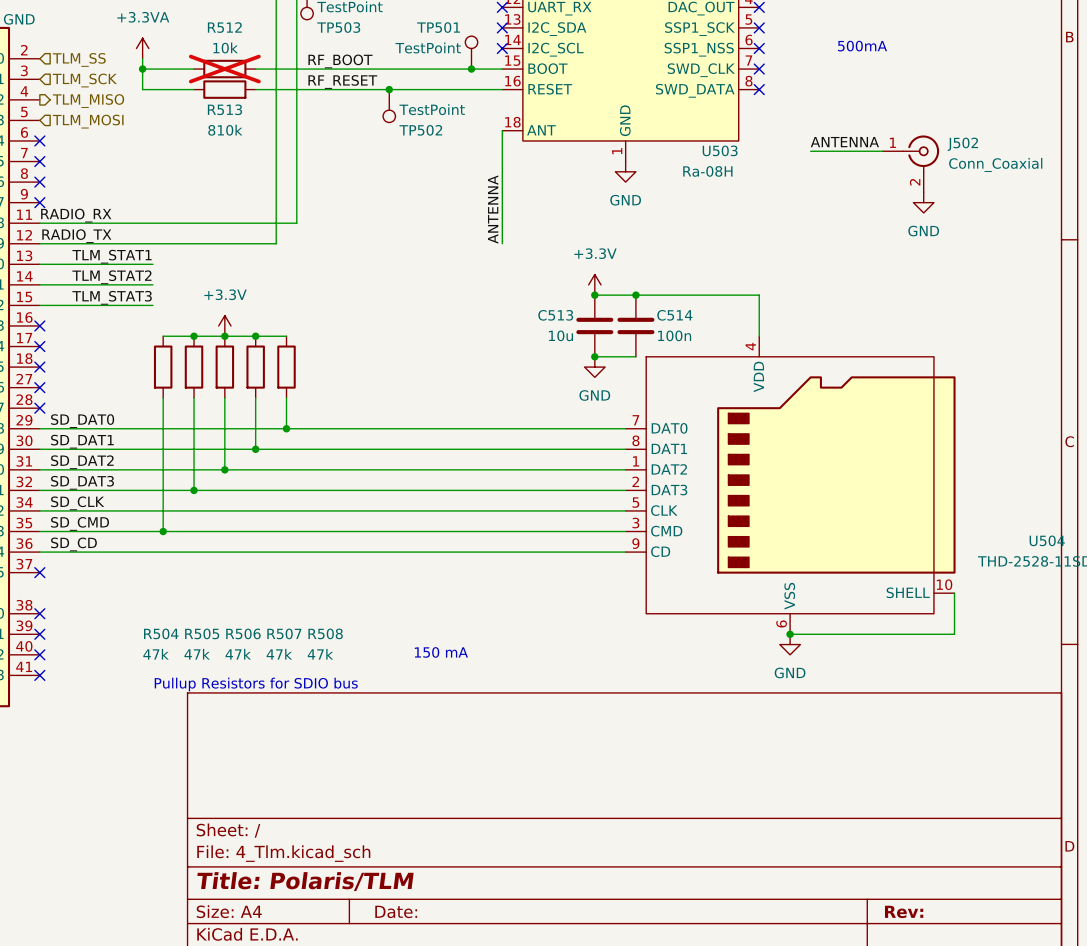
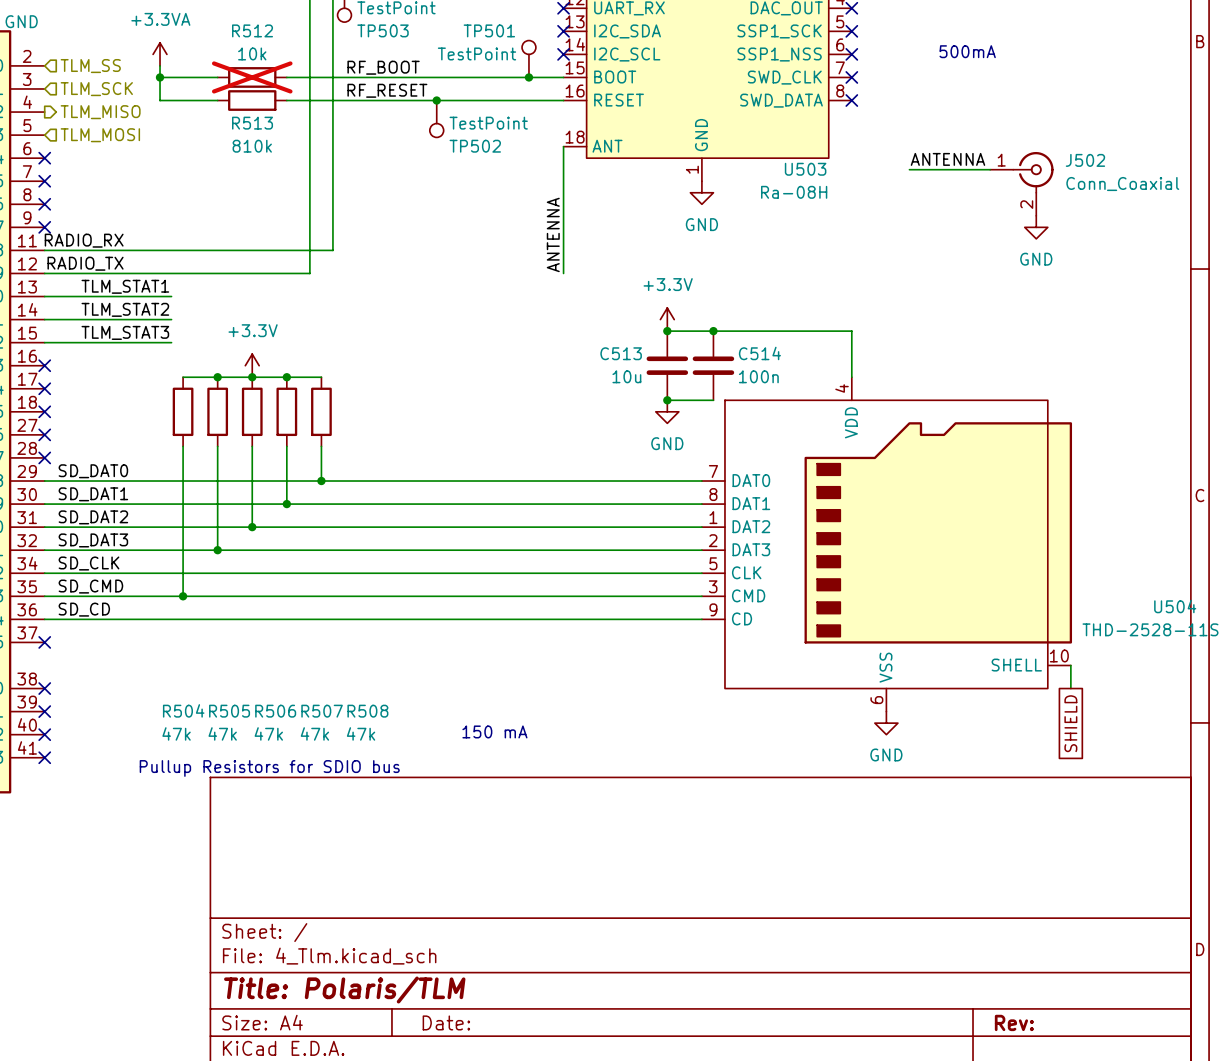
wire: (954, 613) (954, 634) (790, 634) -> none
junction: (790, 634) -> none
global label: none -> SHIELD (1070, 723)

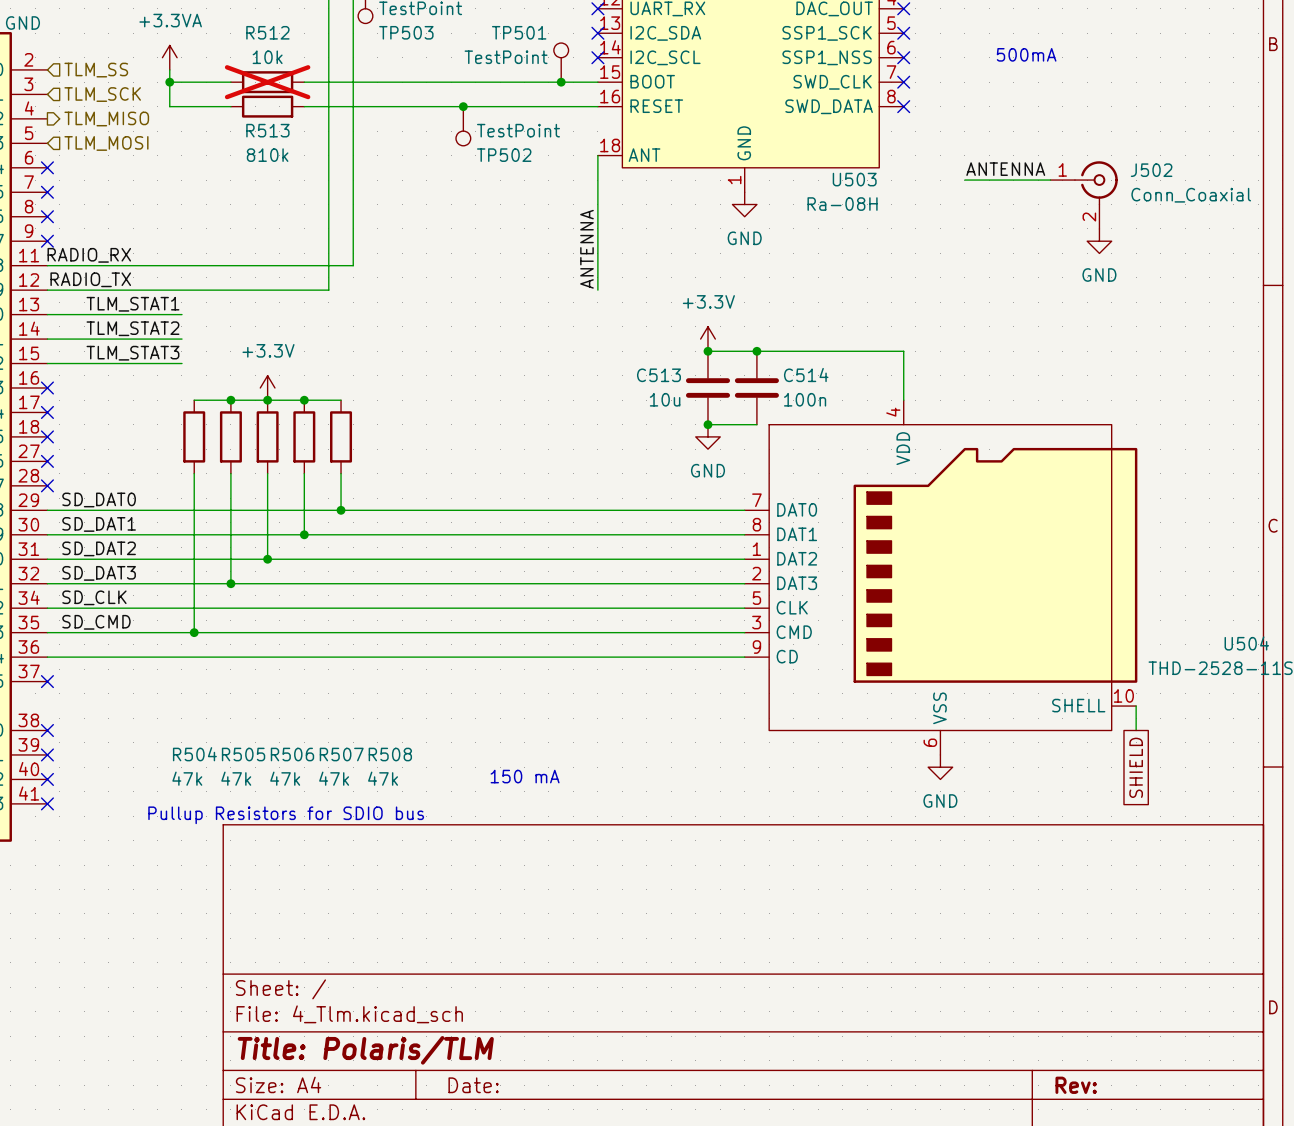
label: RF_BOOT (383, 67) -> none
label: RF_RESET (387, 90) -> none
label: SD_CD (84, 609) -> none

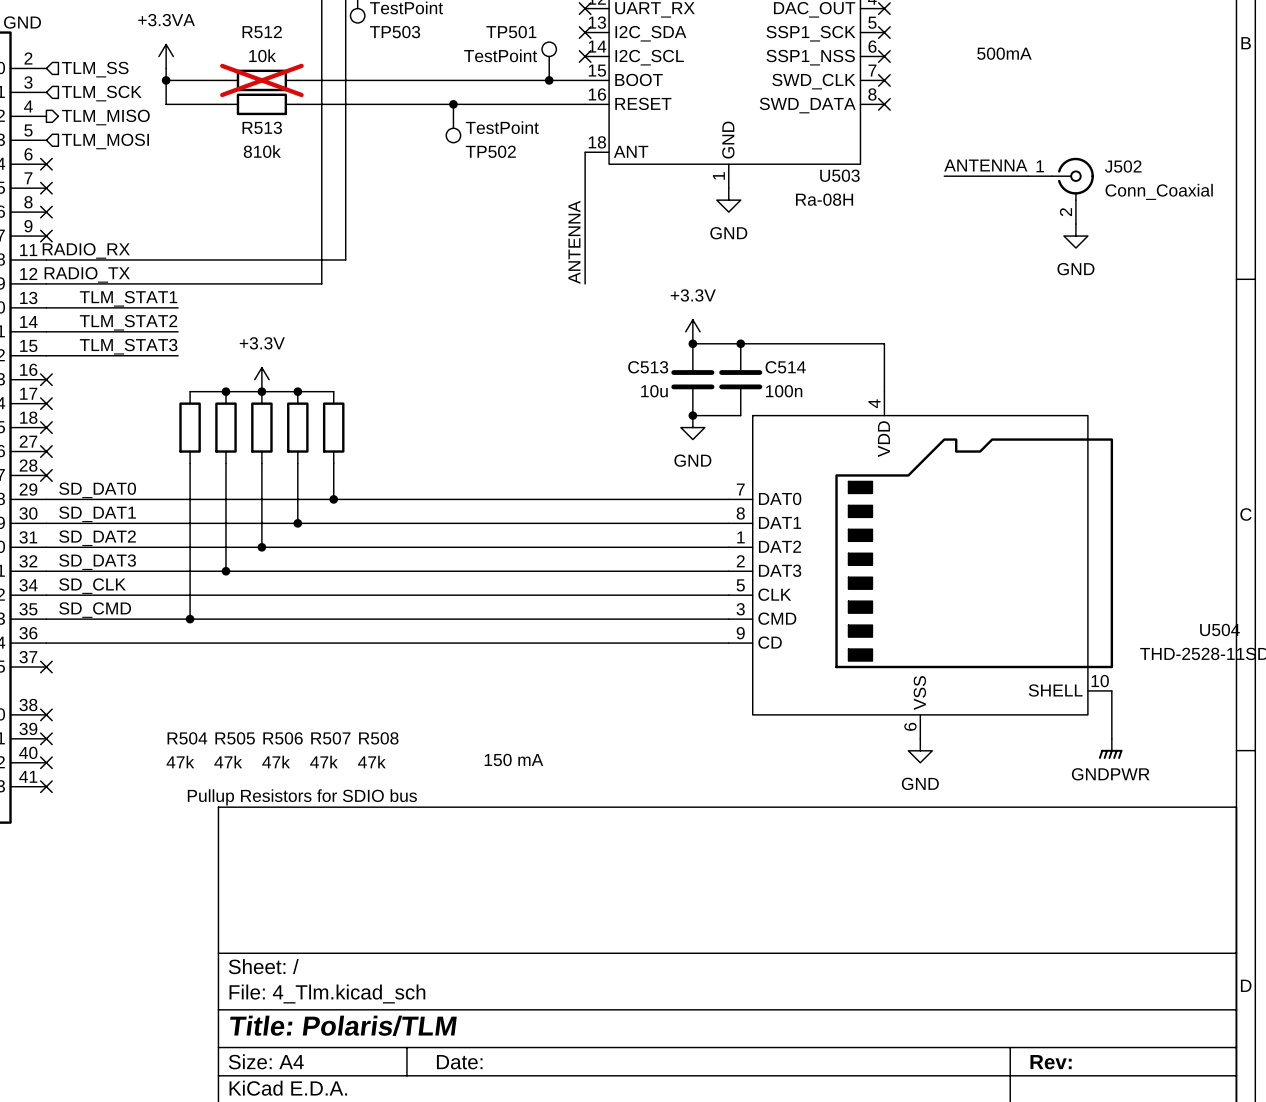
wire: none -> (1111, 714) (1111, 738)
power symbol: none -> GNDPWR (1110, 748)
global label: SHIELD (1136, 767) -> none

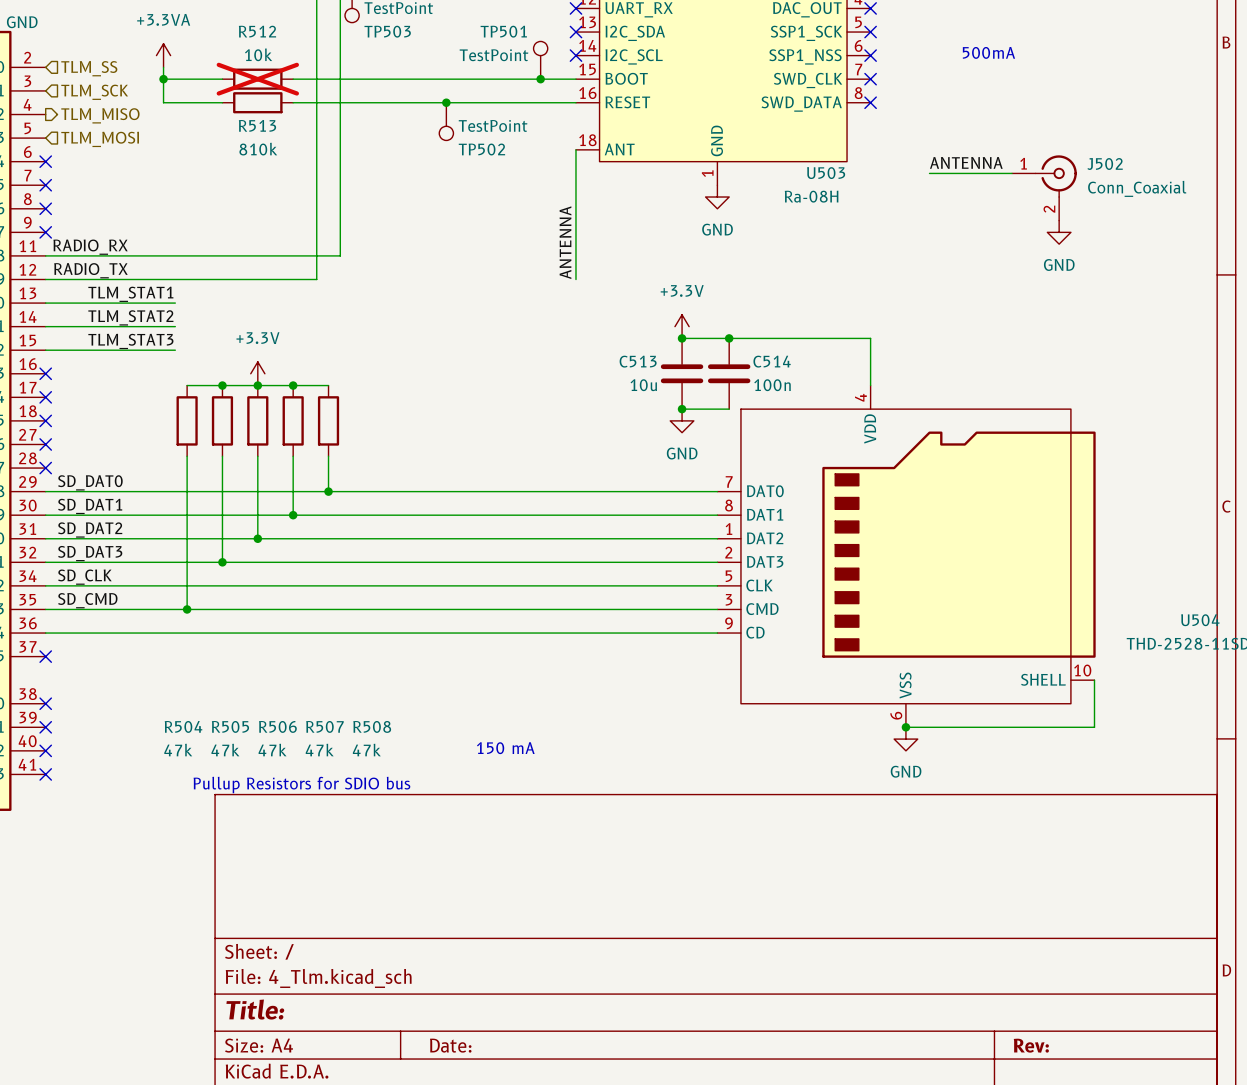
wire: none -> (905, 727) (1094, 727)
junction: none -> (905, 727)
power symbol: GNDPWR (1110, 748) -> none
title block: Title: Polaris/TLM (343, 1025) -> Title: (255, 1009)

